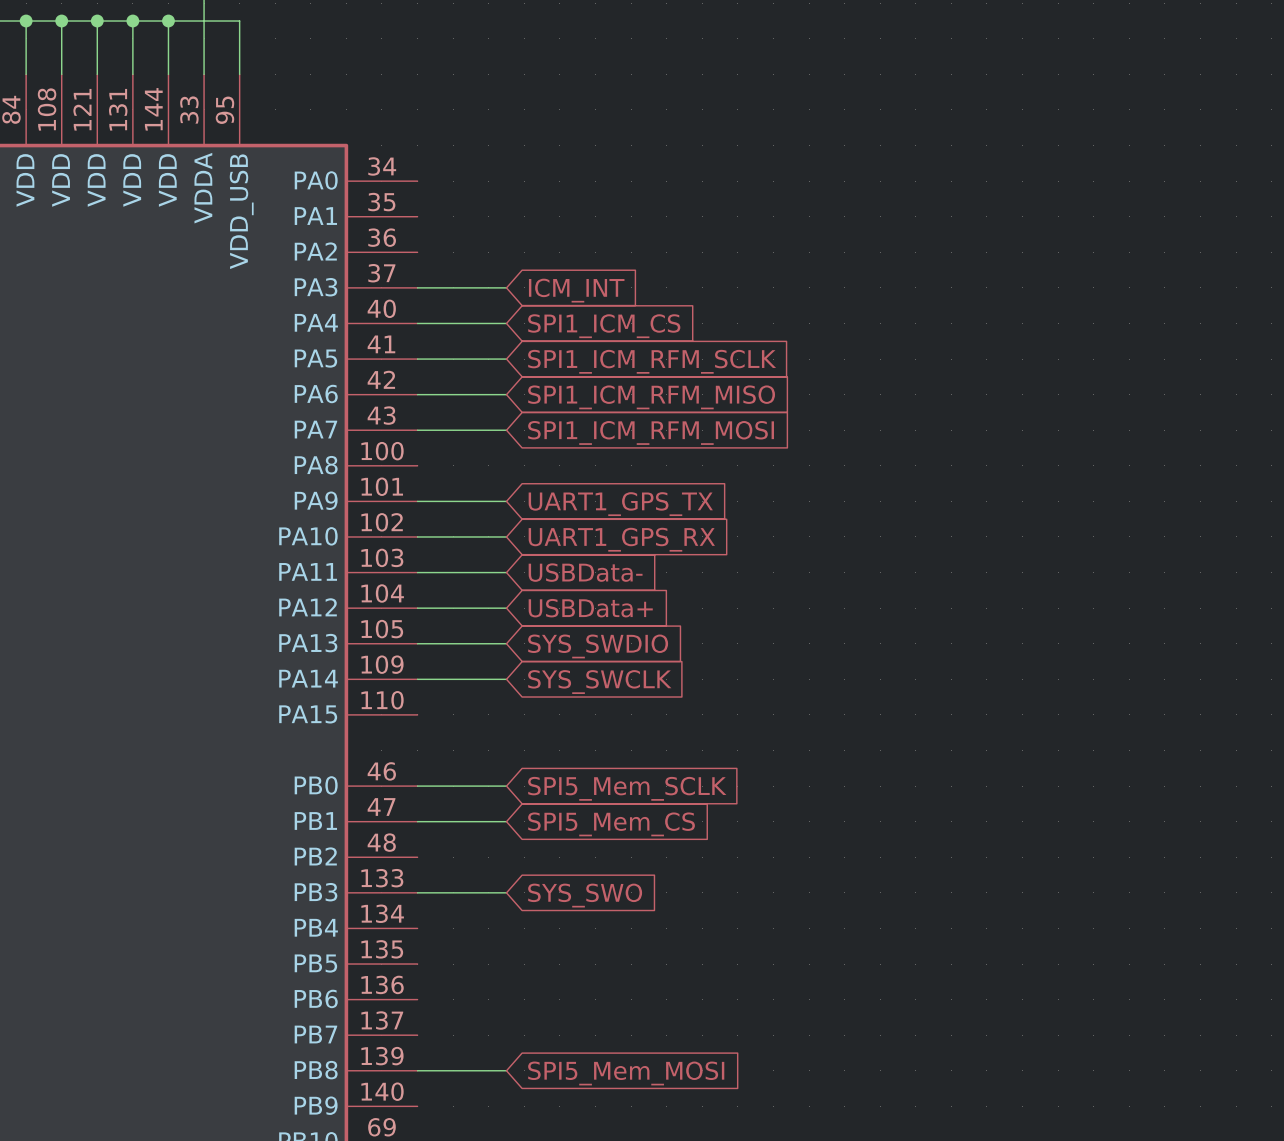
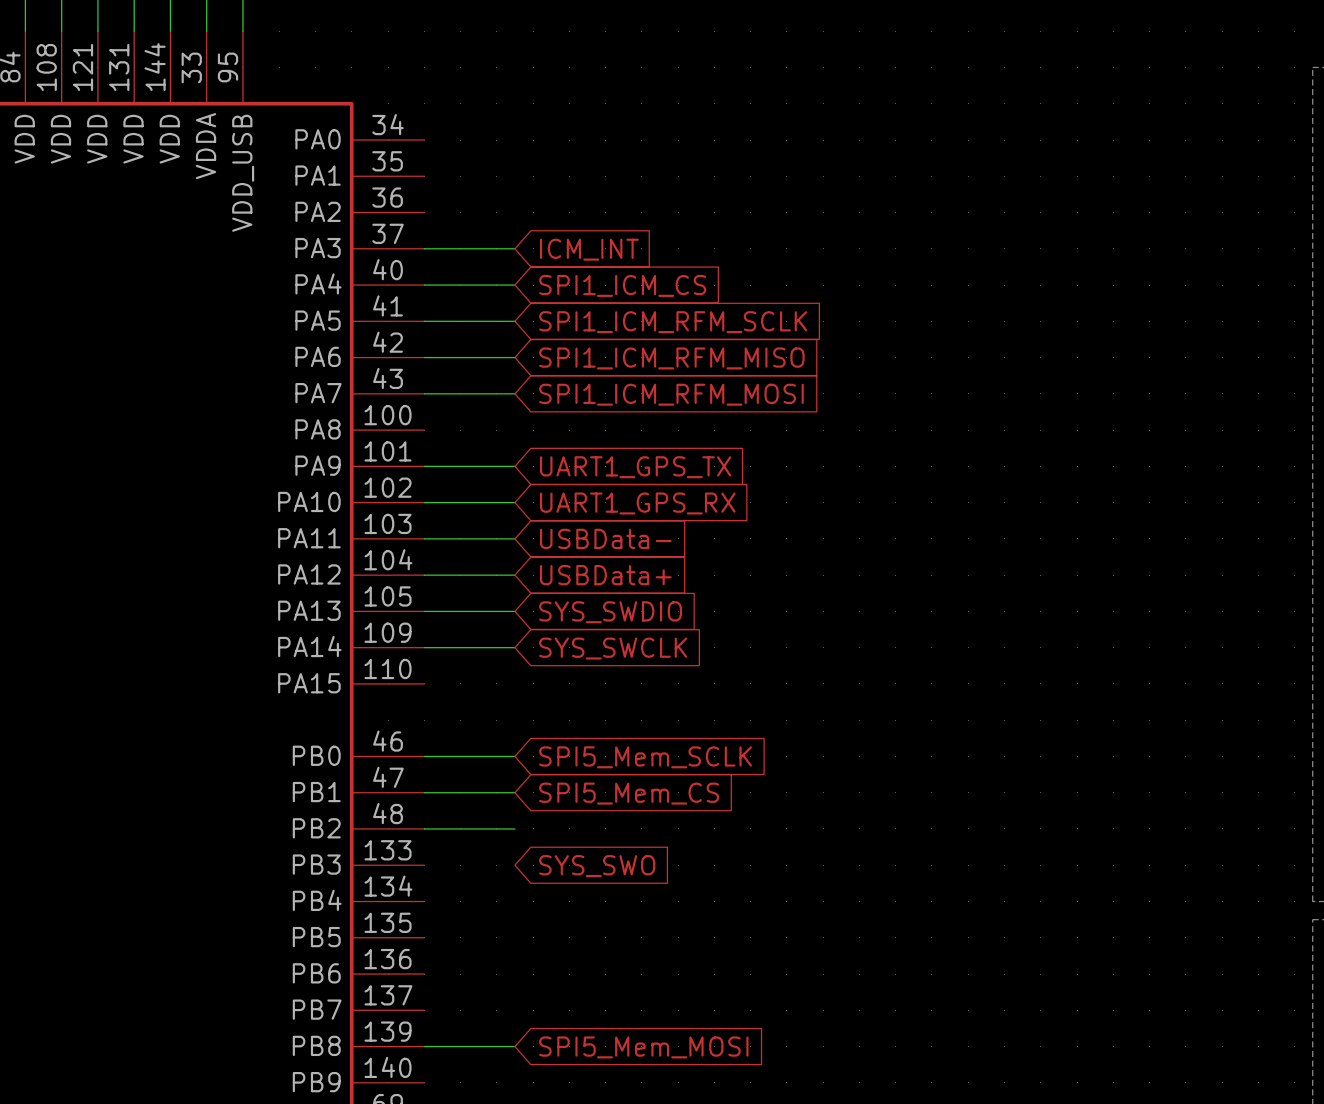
wire: (417, 892) (506, 892) -> (424, 828) (514, 828)

